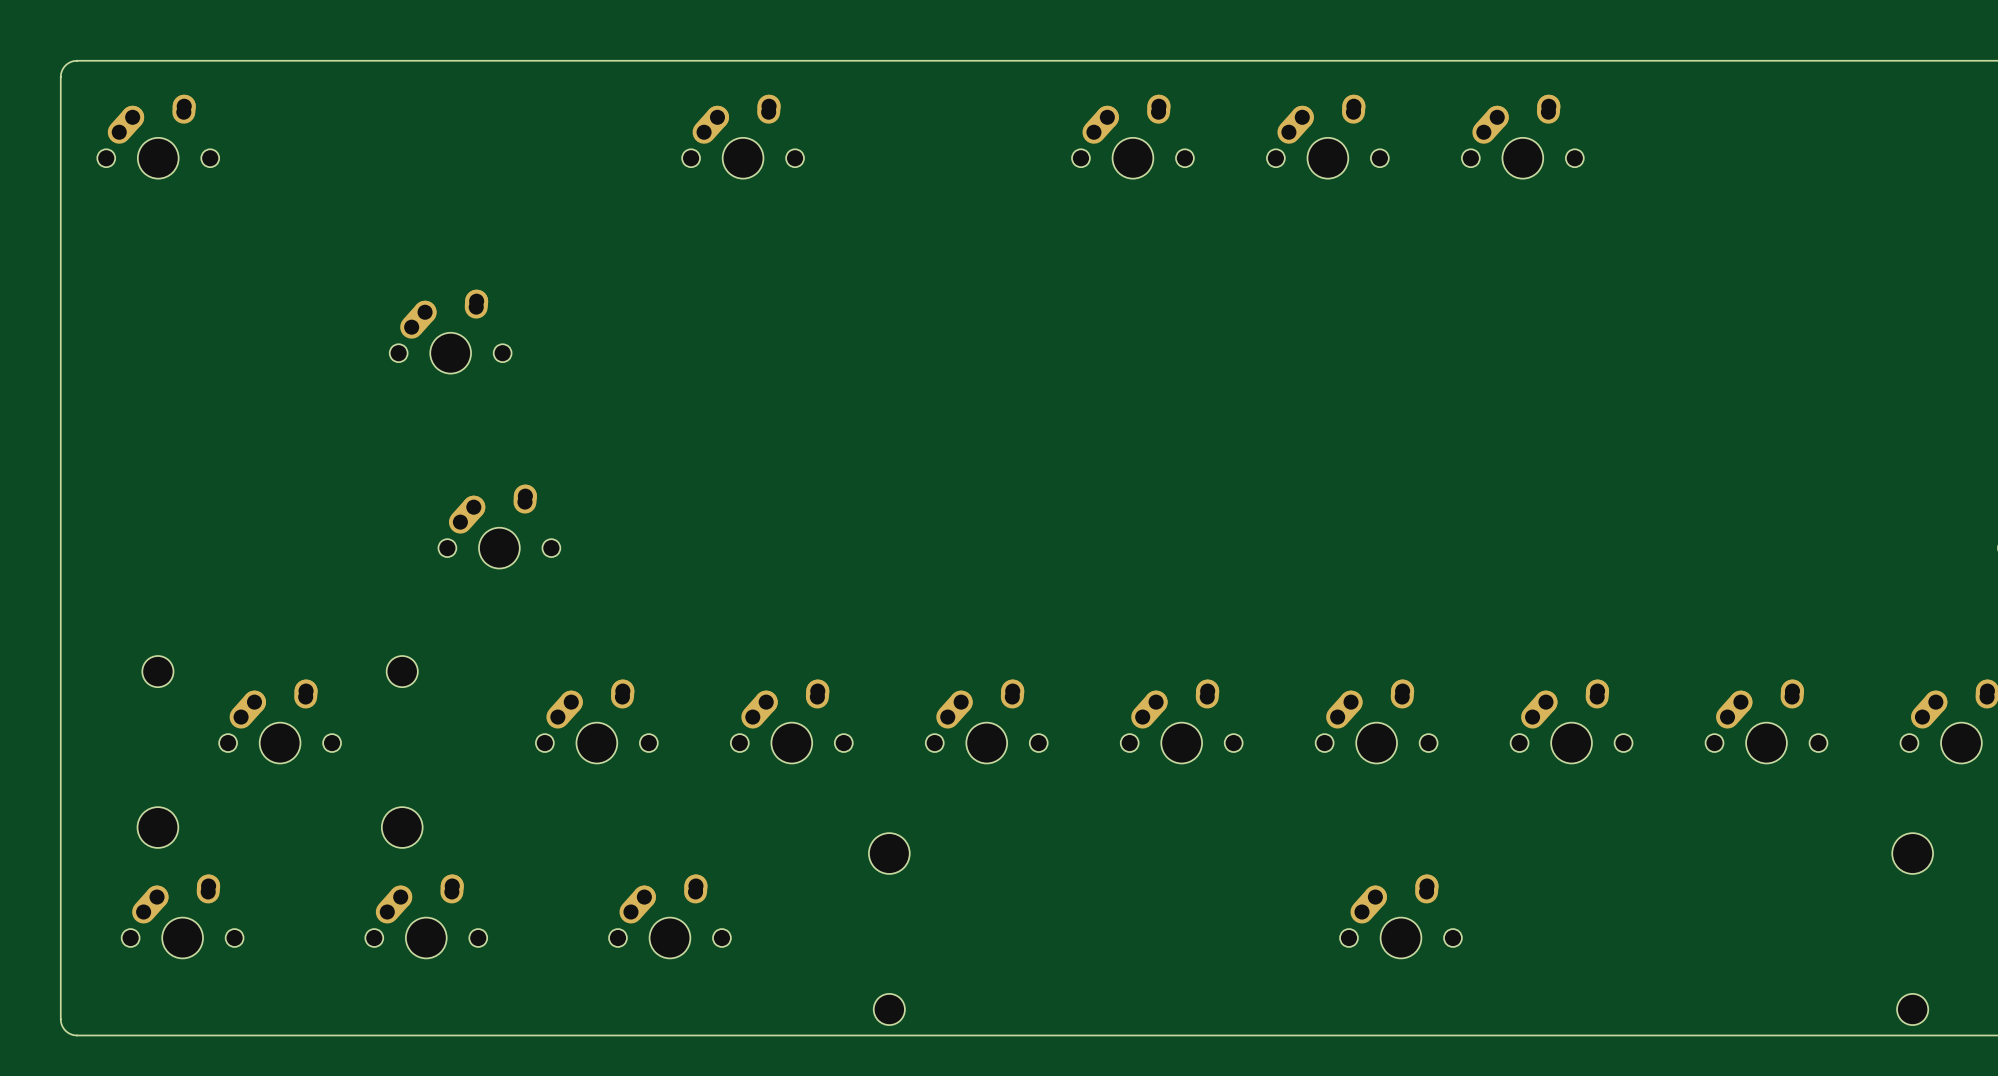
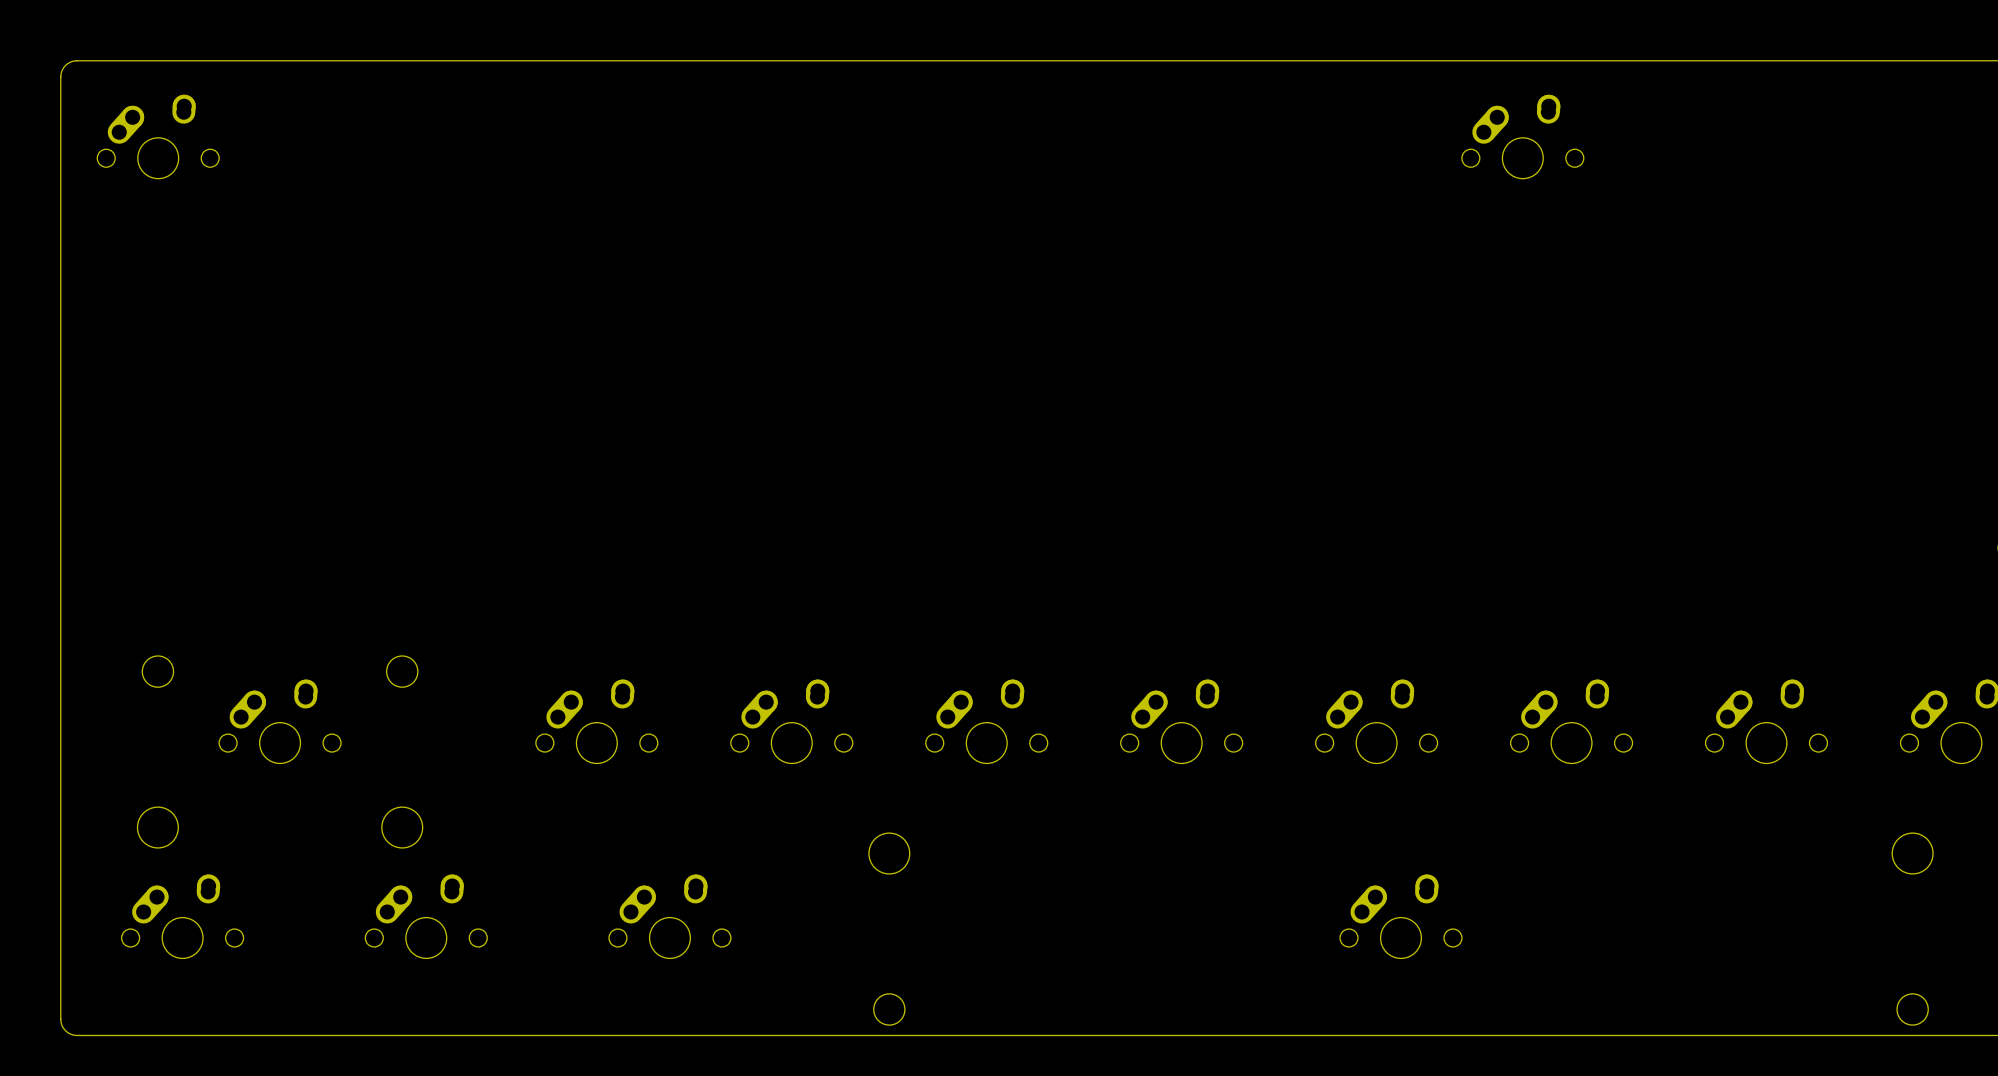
part: (743, 136) -> none
part: (1132, 136) -> none
part: (1327, 136) -> none
part: (450, 331) -> none
part: (499, 526) -> none

